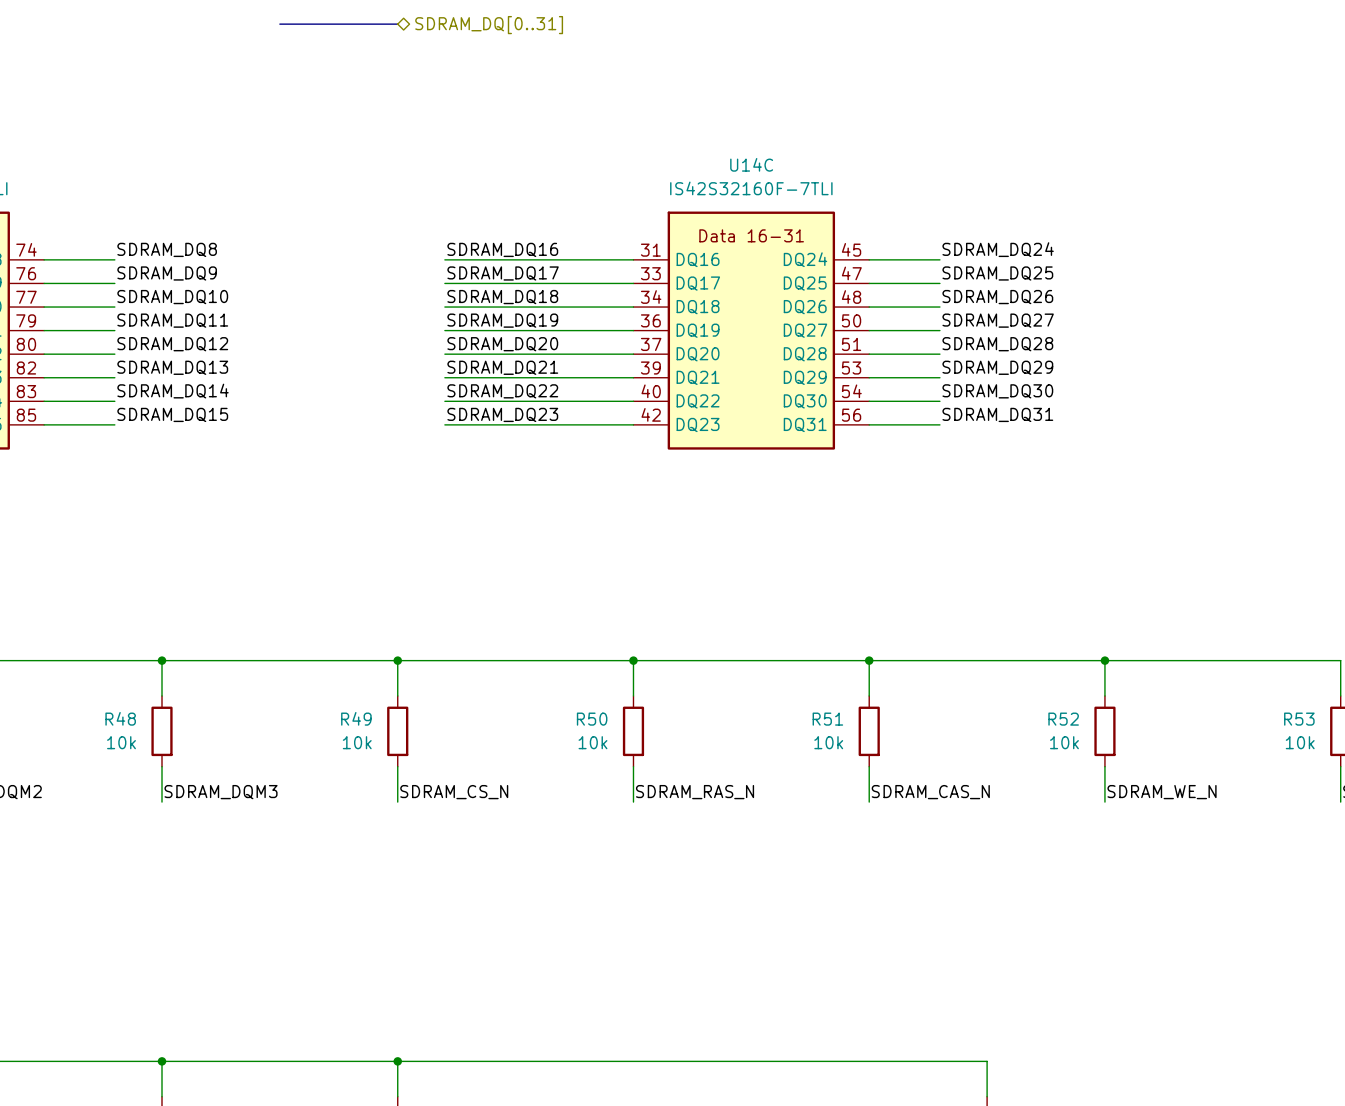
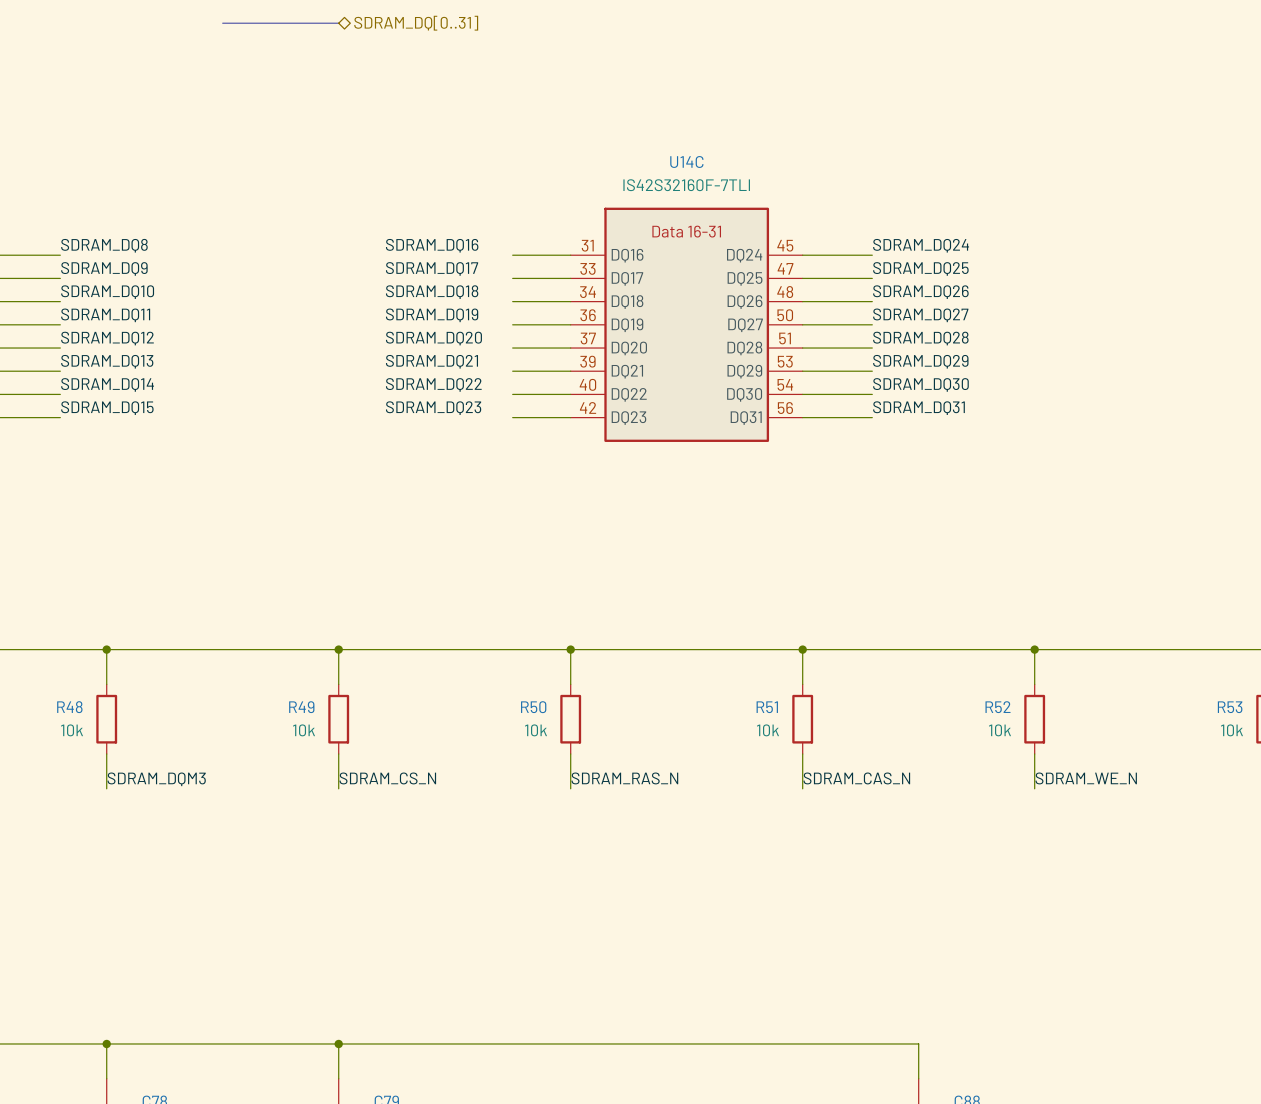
wire: (444, 259) (574, 259) -> none
wire: (444, 283) (574, 283) -> none
wire: (444, 307) (574, 307) -> none
wire: (444, 330) (574, 330) -> none
wire: (444, 354) (574, 354) -> none
wire: (444, 377) (574, 377) -> none
wire: (444, 401) (574, 401) -> none
wire: (444, 424) (574, 424) -> none

